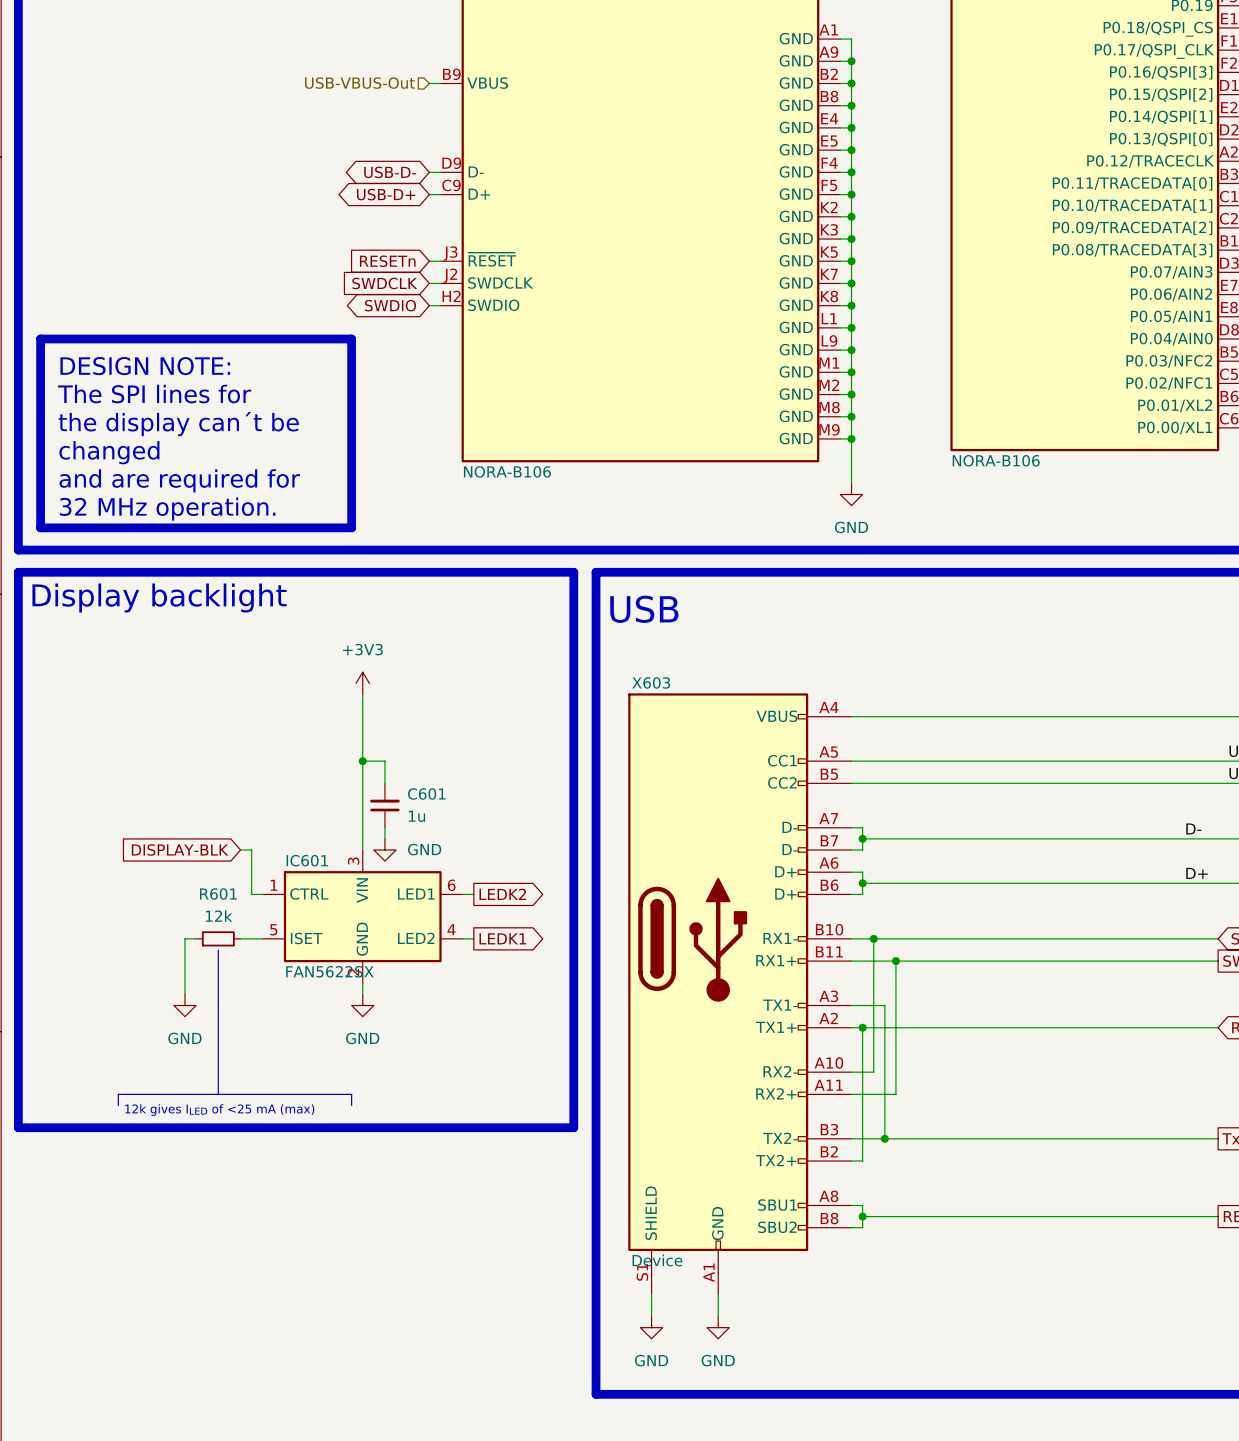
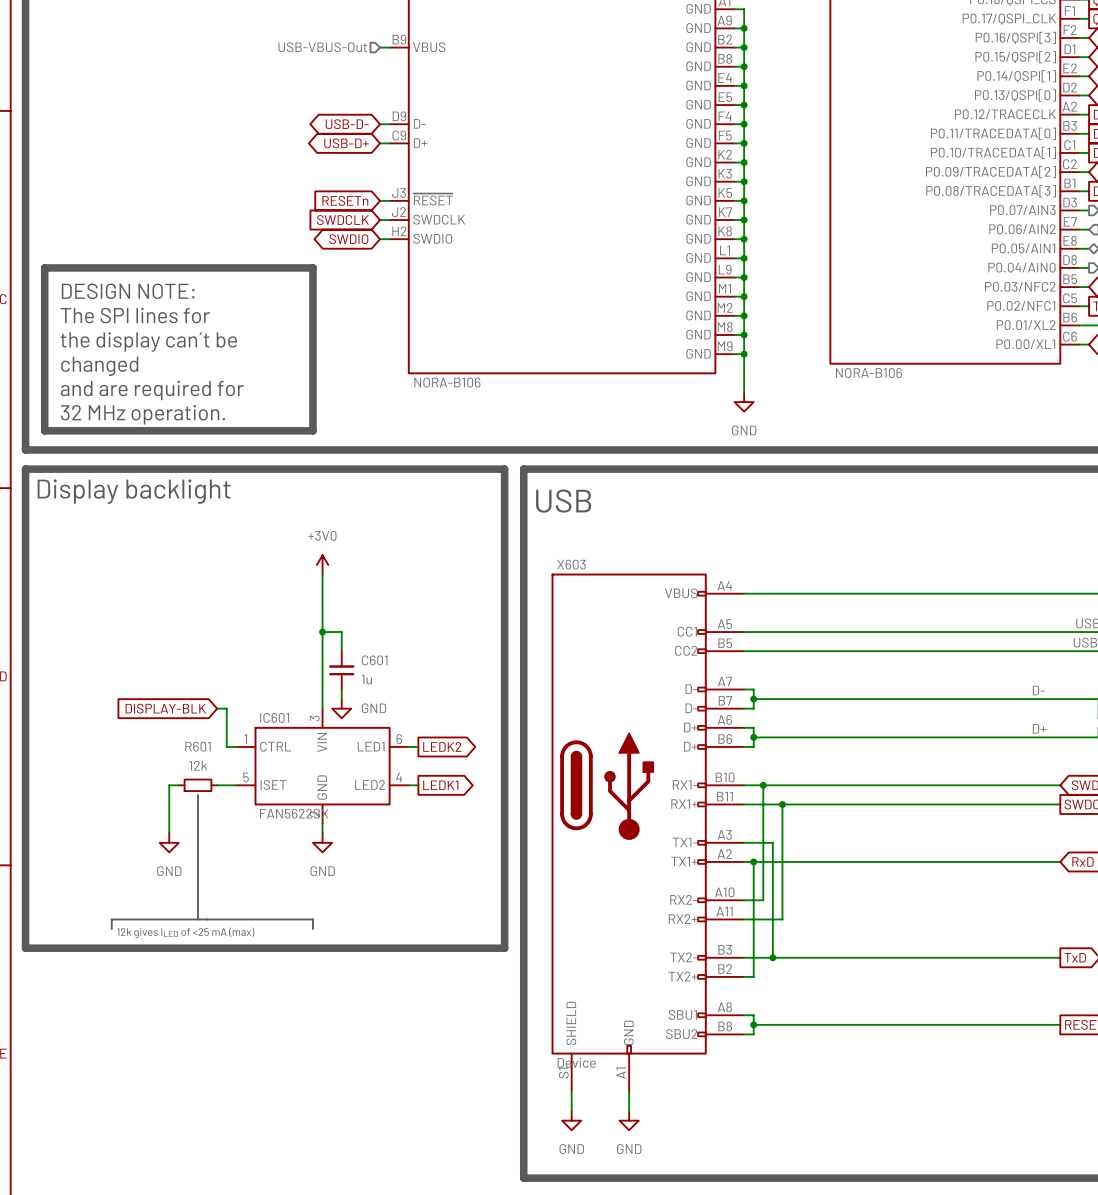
power symbol: +3V3 (362, 683) -> +3V0 (322, 564)

